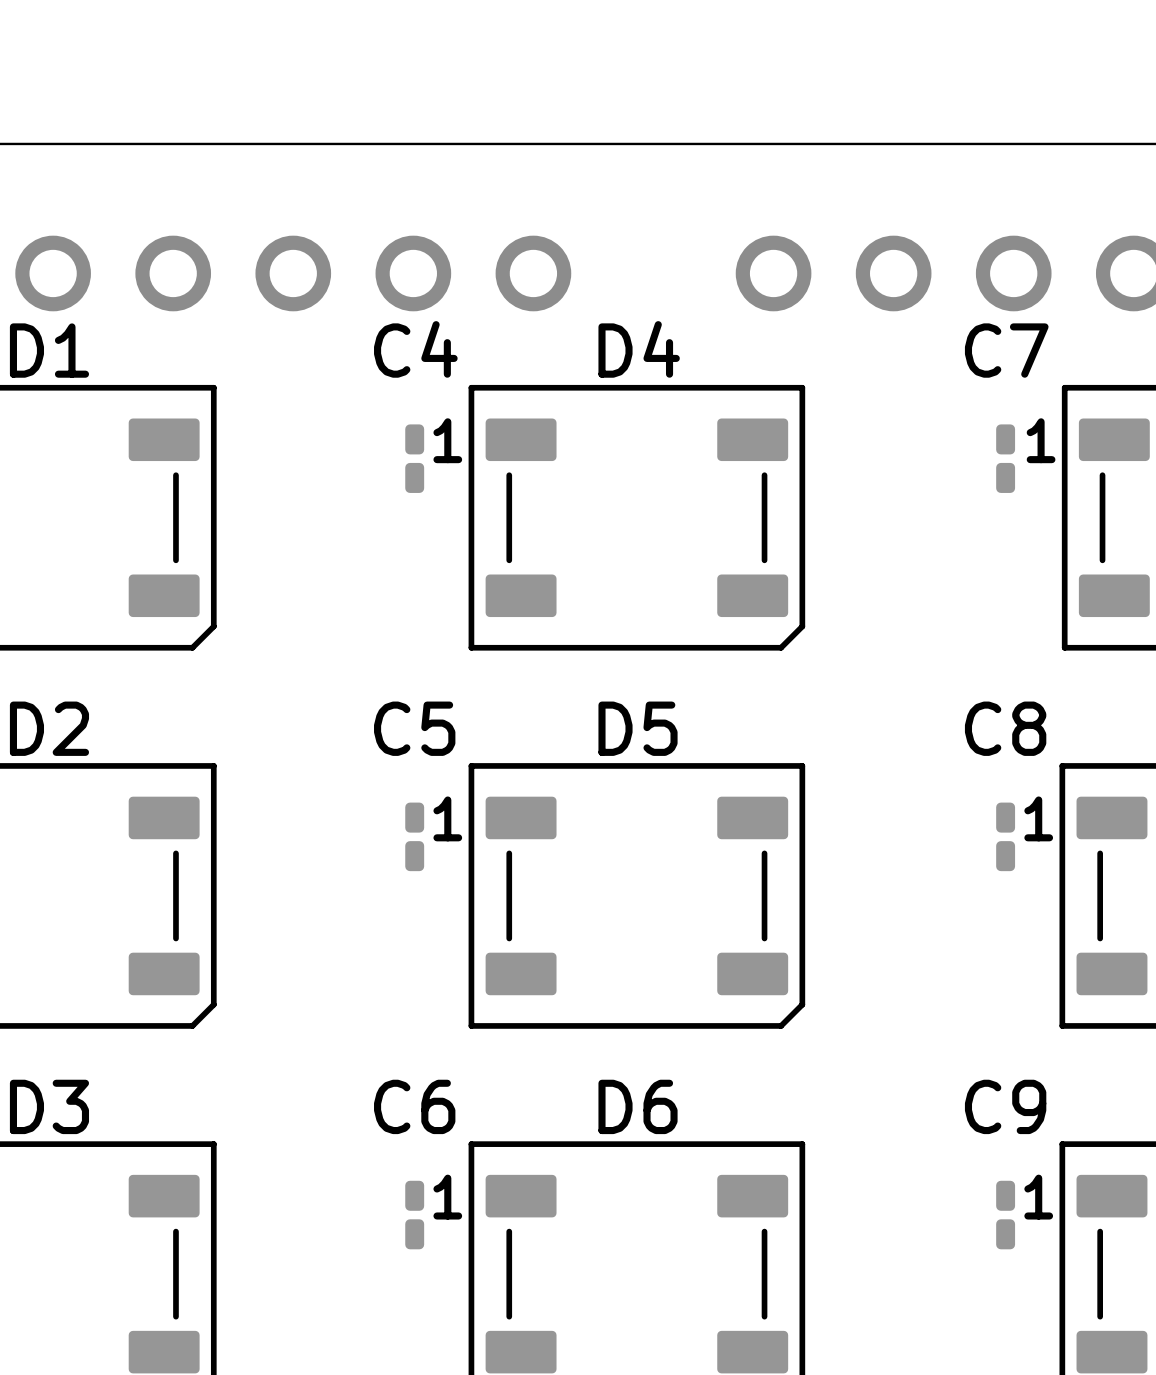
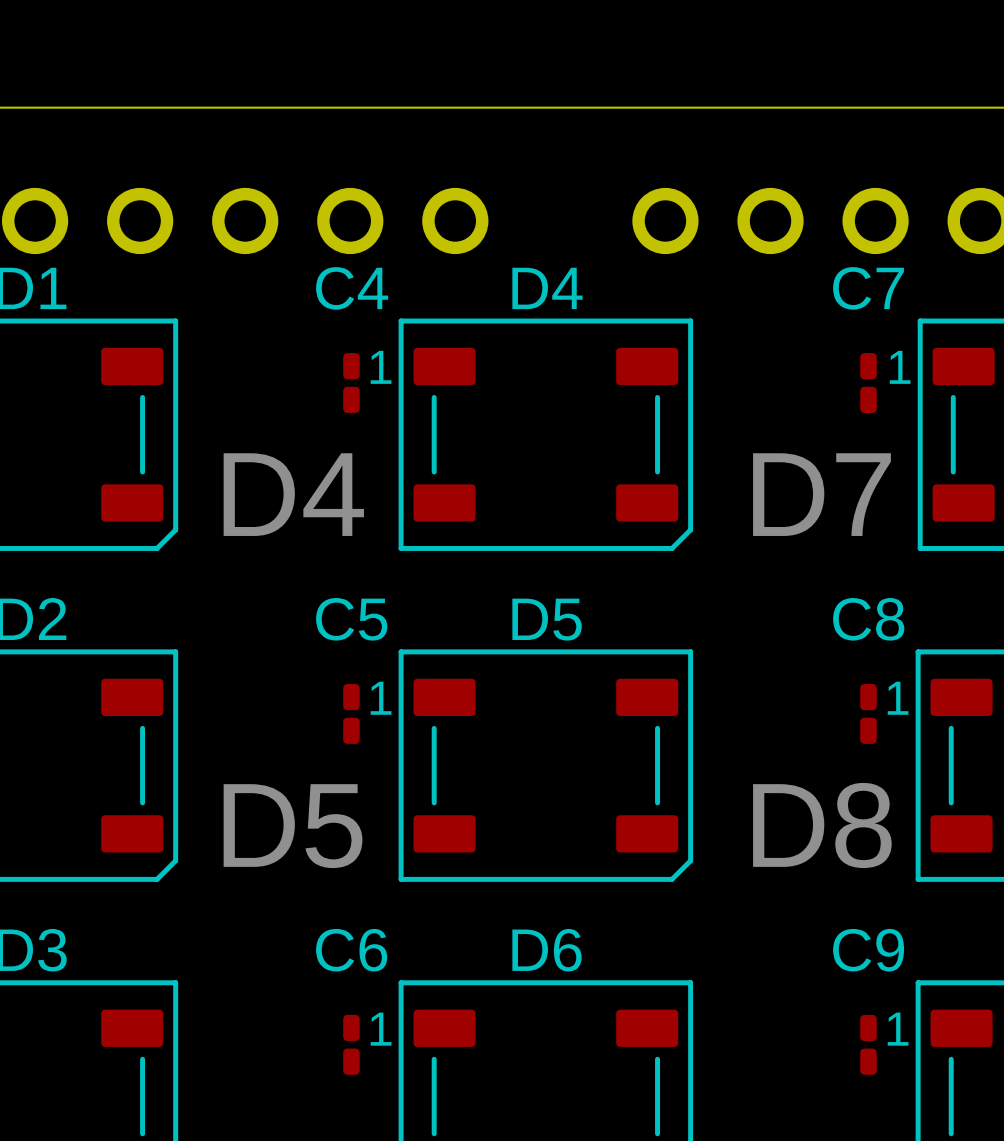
text: none -> D4 (293, 494)
text: none -> D7 (821, 494)
text: none -> D5 (293, 826)
text: none -> D8 (822, 825)

